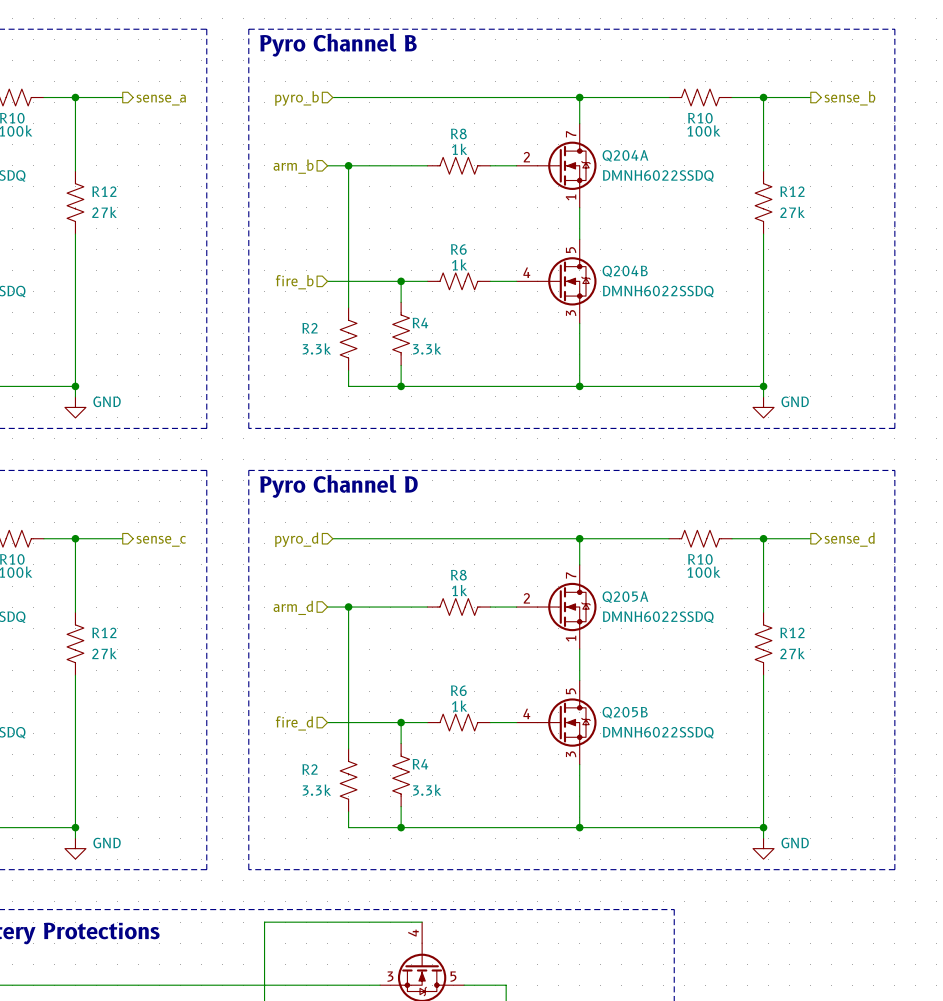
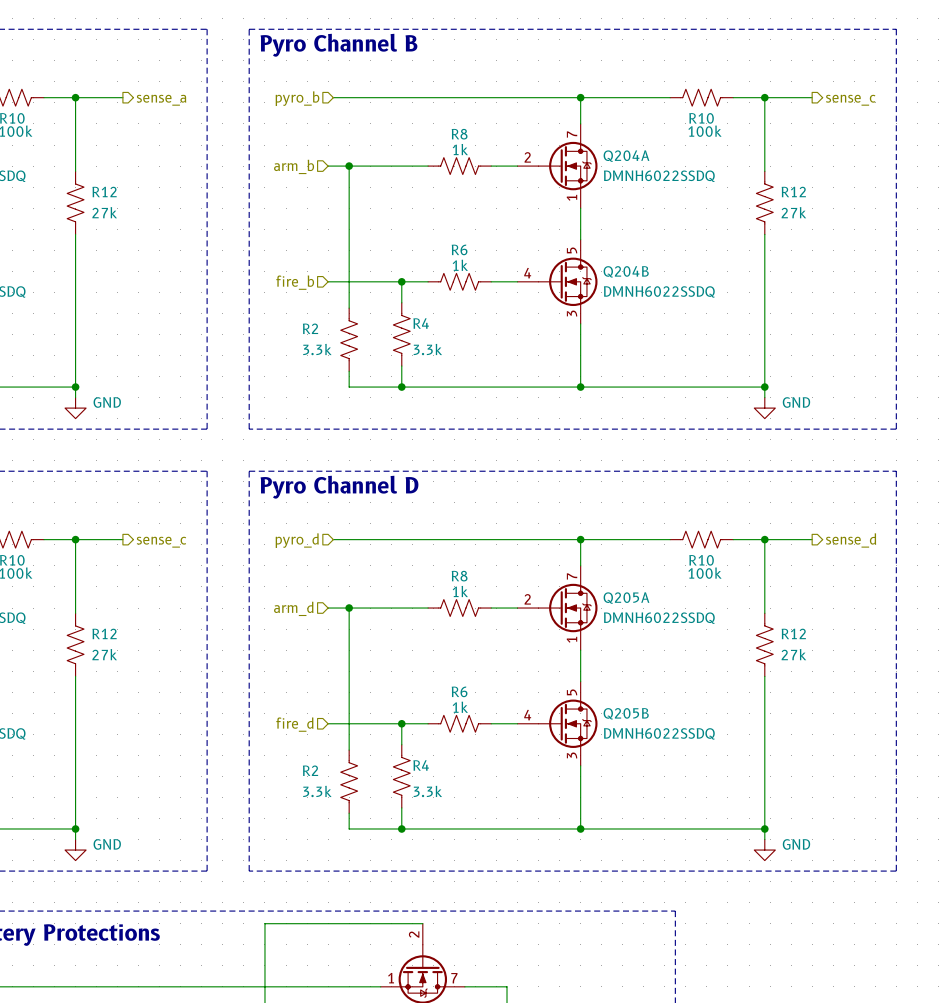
hierarchical label: sense_b (849, 98) -> sense_c (850, 100)
part pin number: 4 (413, 933) -> 2 (414, 934)
part pin number: 3 (390, 976) -> 1 (391, 978)
part pin number: 5 (453, 976) -> 7 (454, 978)

